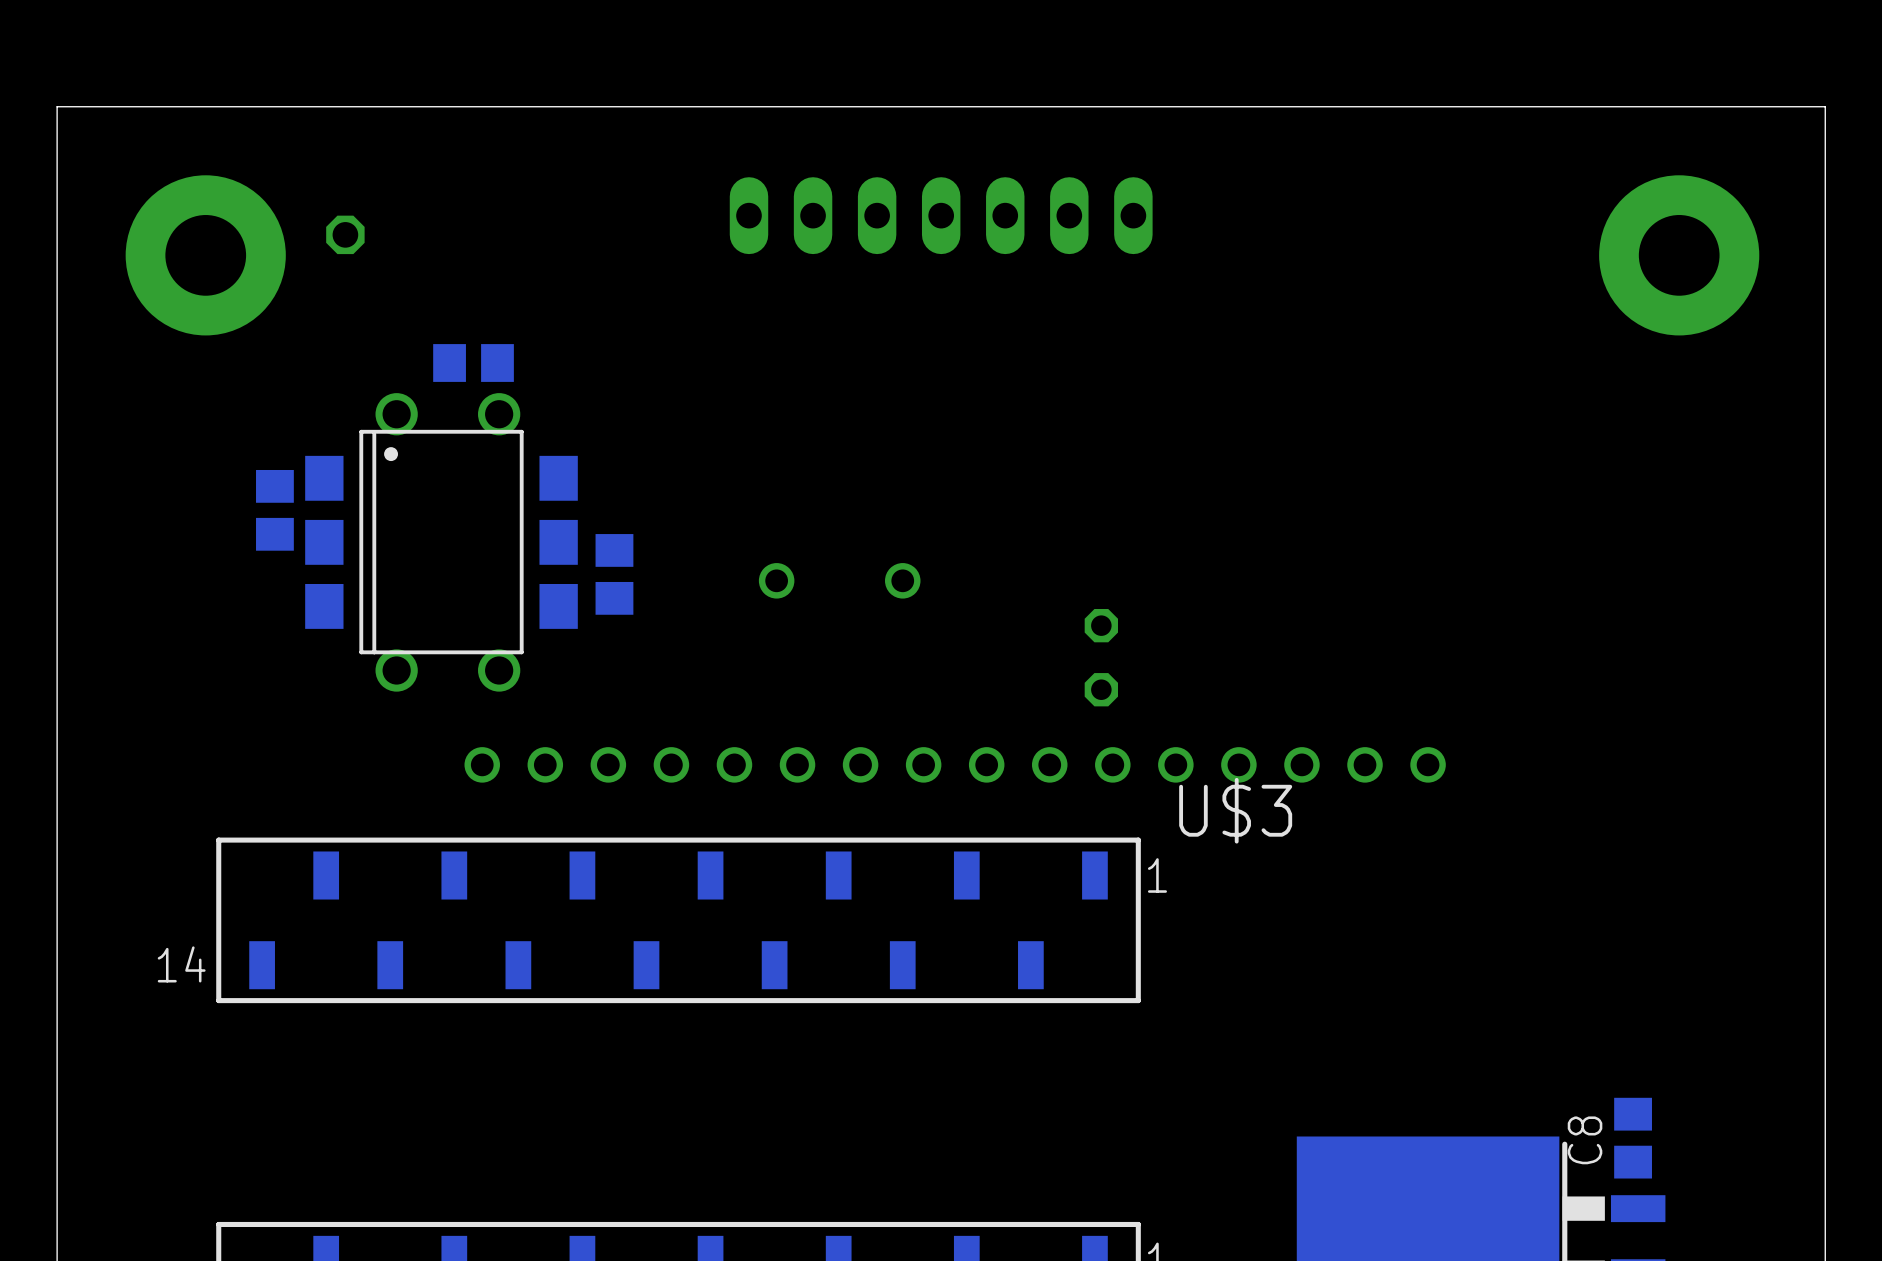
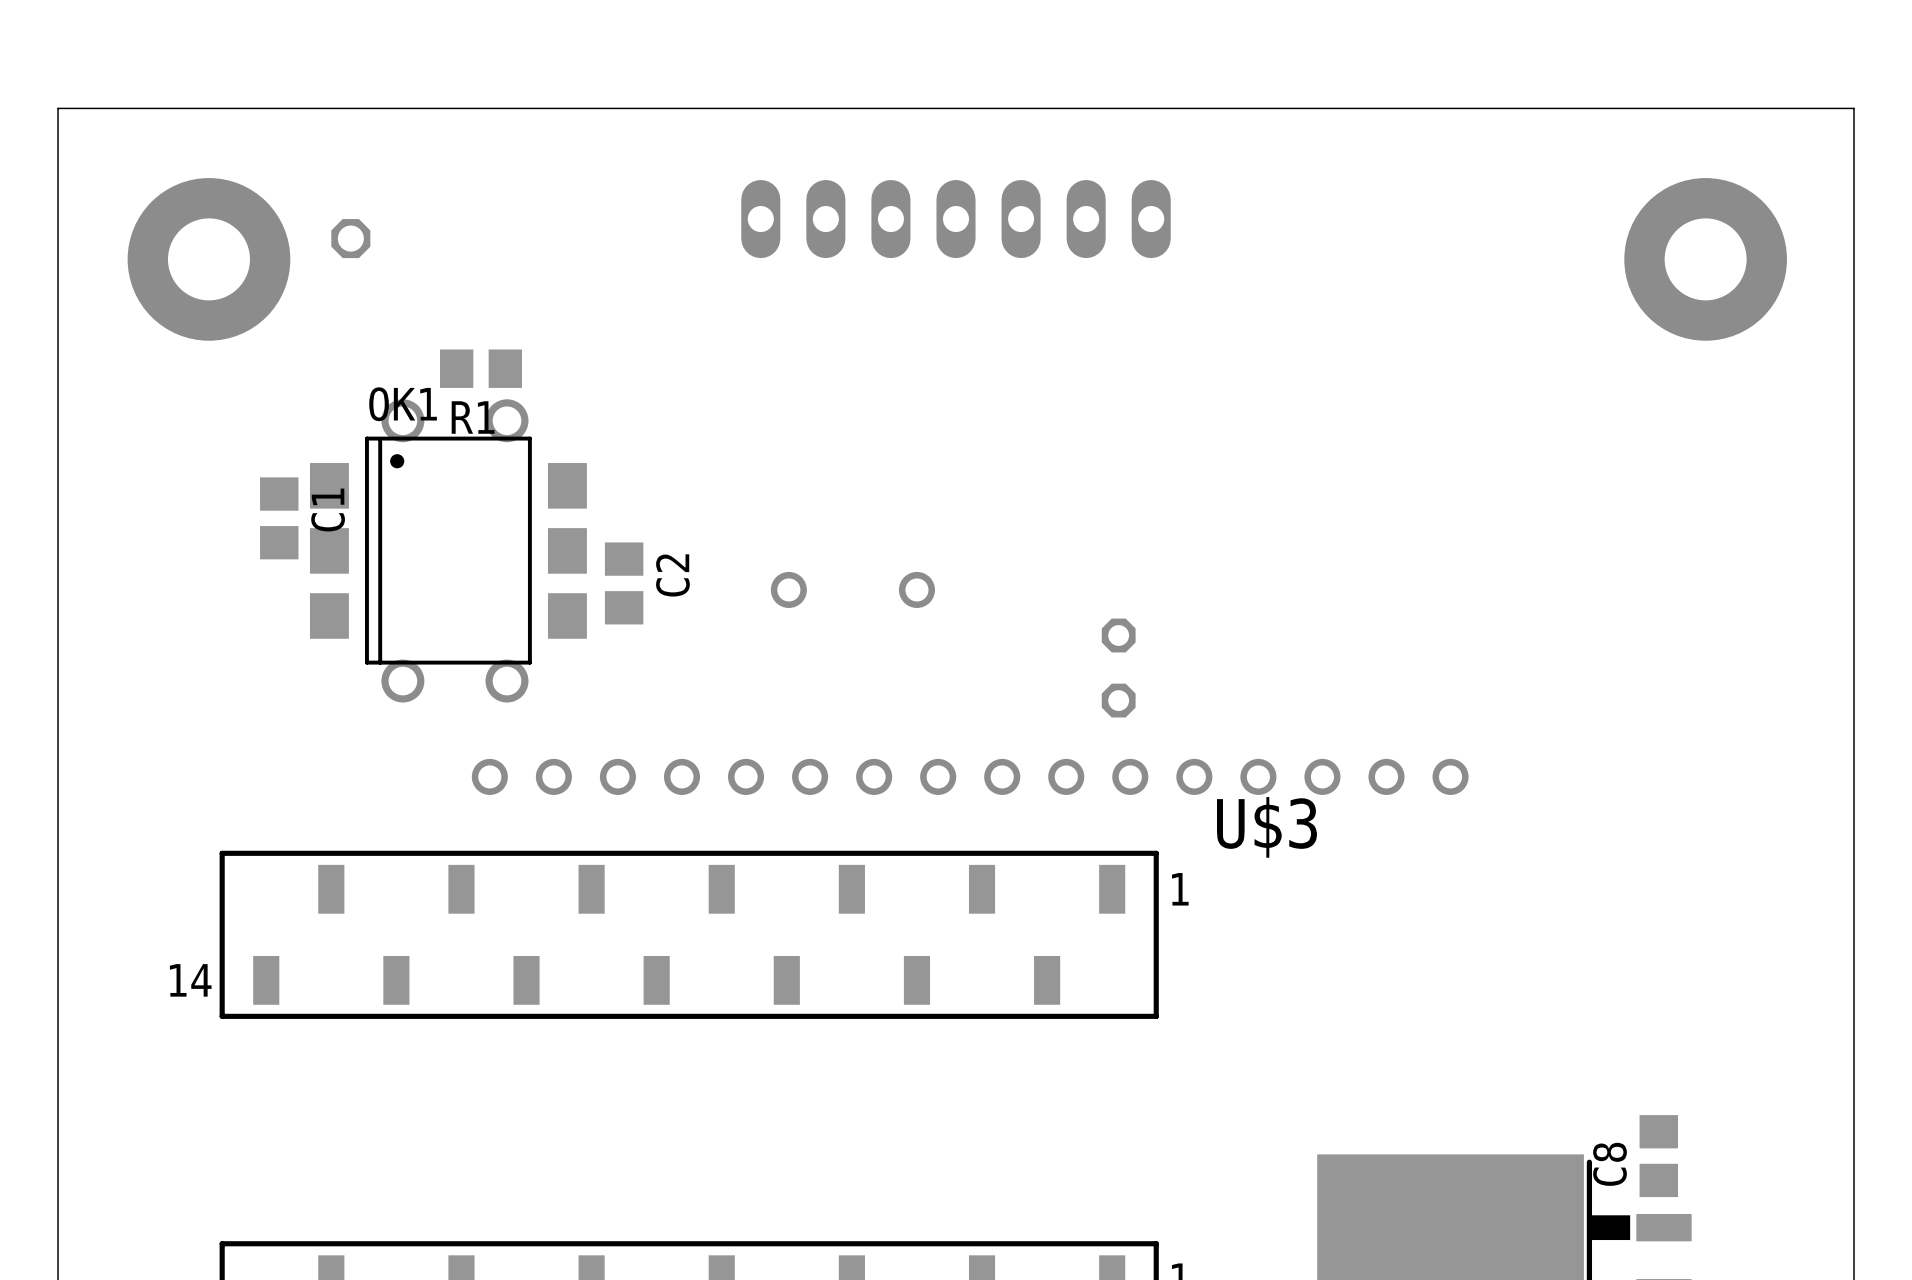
OK1 name: none -> OK1 (403, 404)
R1 name: none -> R1 (473, 417)
C1 name: none -> C1 (328, 510)
C2 name: none -> C2 (672, 575)

